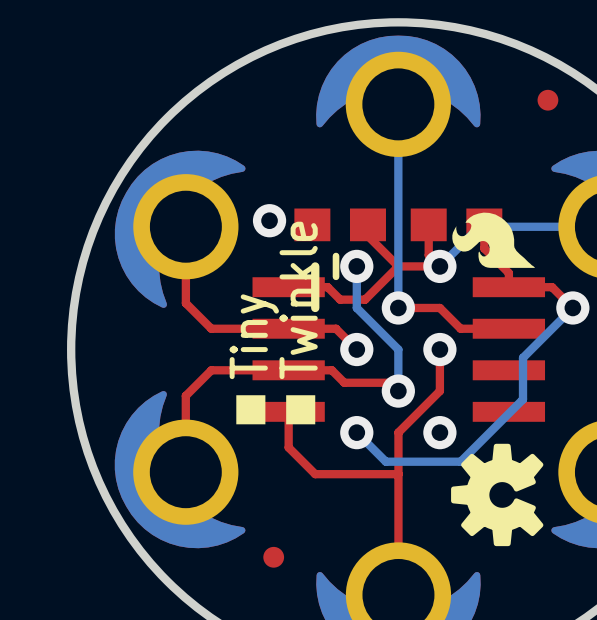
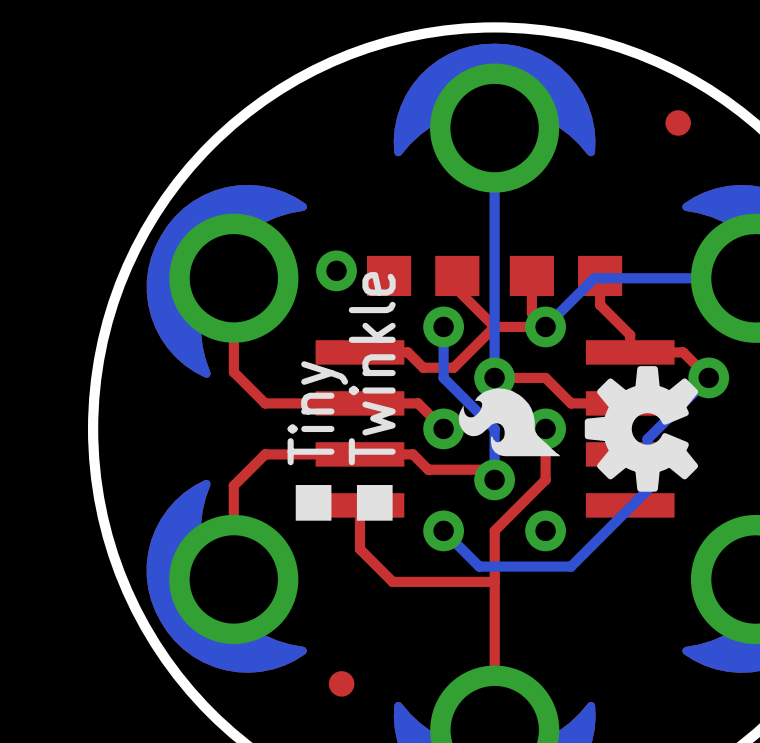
drawing position: (493, 240) -> (509, 422)
line: (336, 256) (336, 276) -> none
line: (315, 266) (315, 307) -> none
drawing position: (497, 494) -> (641, 428)

